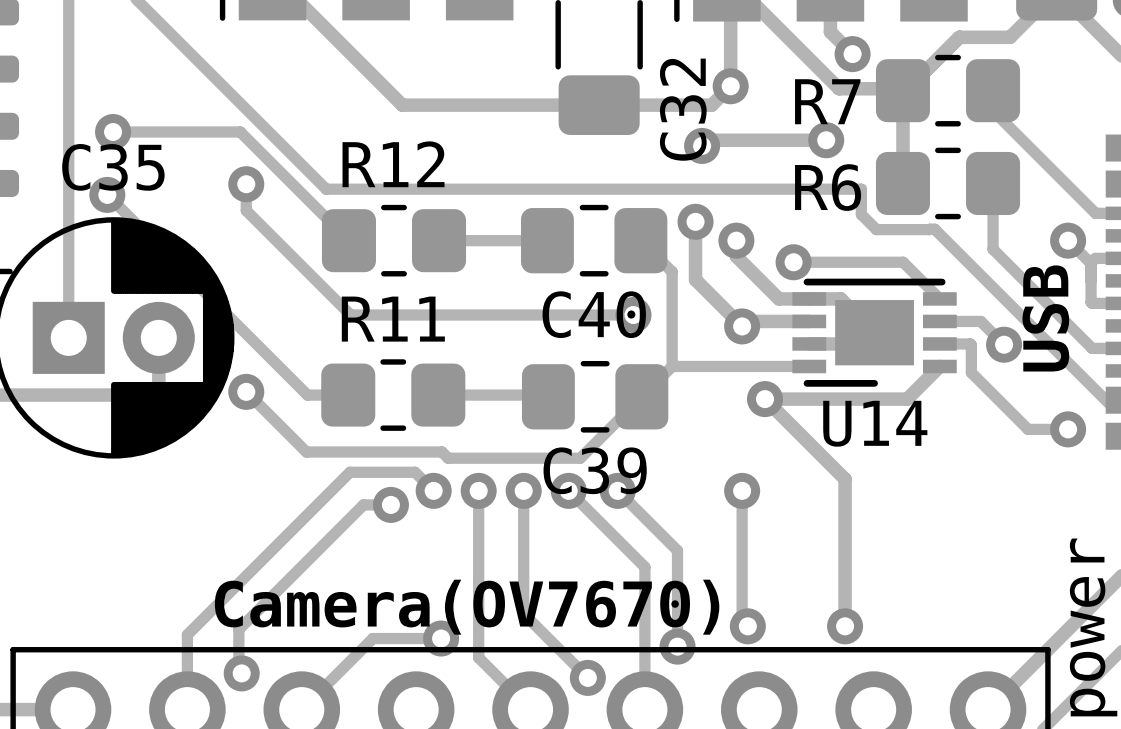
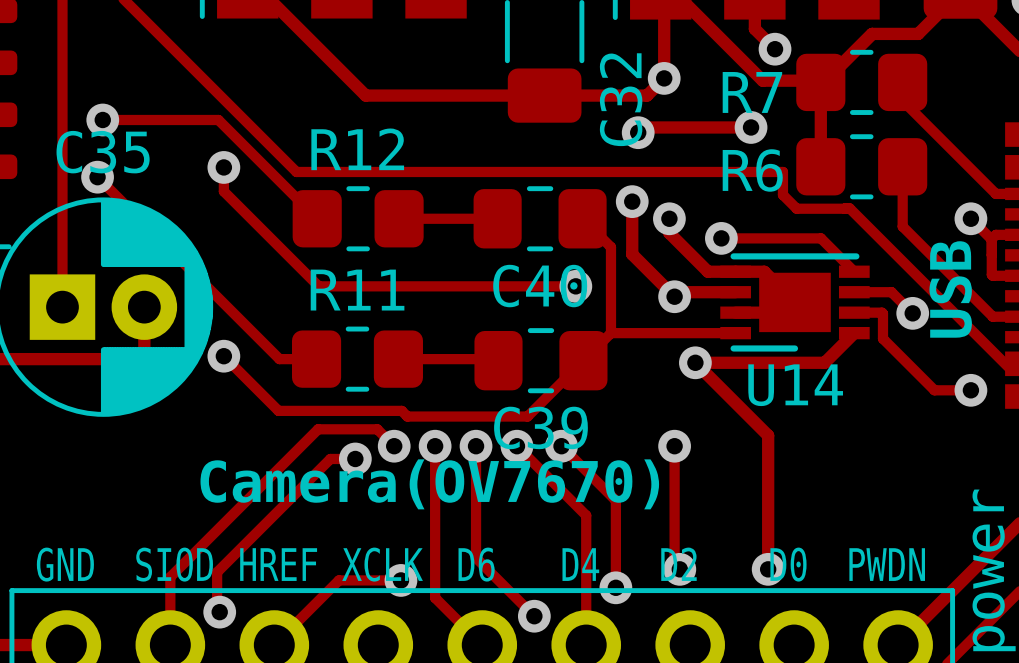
text position: Camera(OV7670) (467, 607) -> Camera(OV7670) (429, 484)
text: none -> D2 (678, 564)
text: none -> GND (65, 564)
text: none -> SIOD (174, 564)
text: none -> HREF (278, 564)
text: none -> XCLK (382, 564)
text: none -> D6 (476, 564)
text: none -> D4 (580, 564)
text: none -> D0 (788, 564)
text: none -> PWDN (887, 564)

